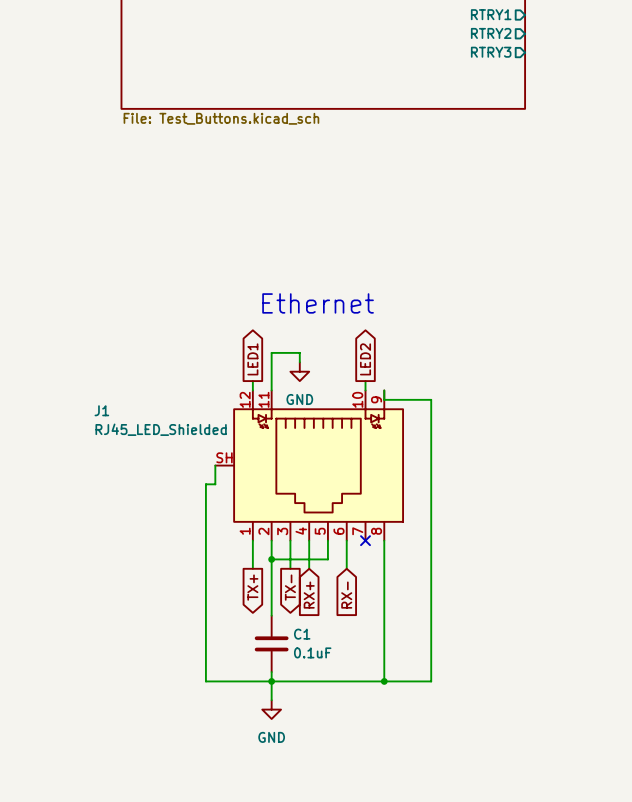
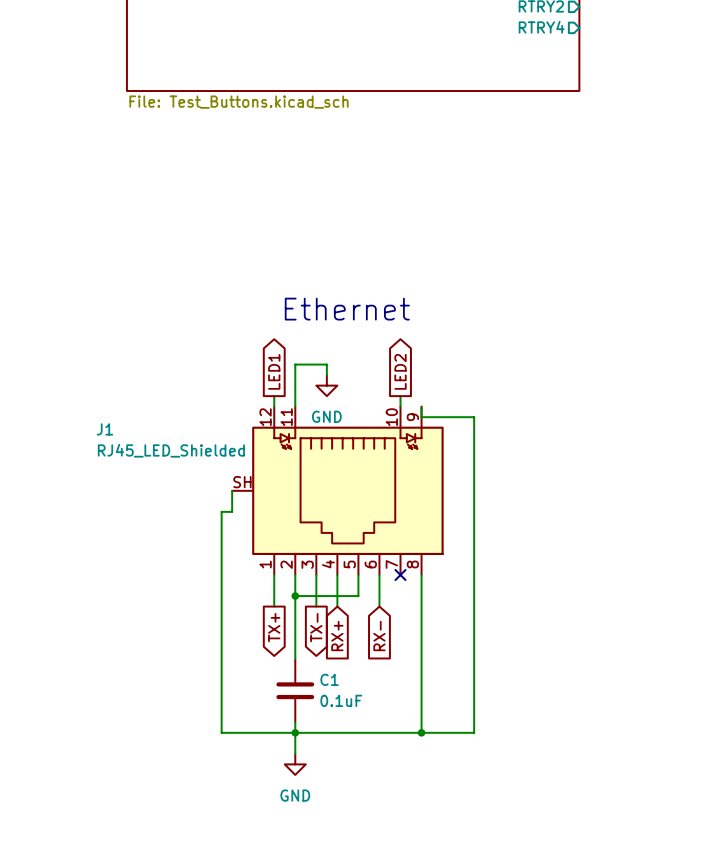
sheet pin: RTRY3 (491, 52) -> RTRY4 (541, 27)

